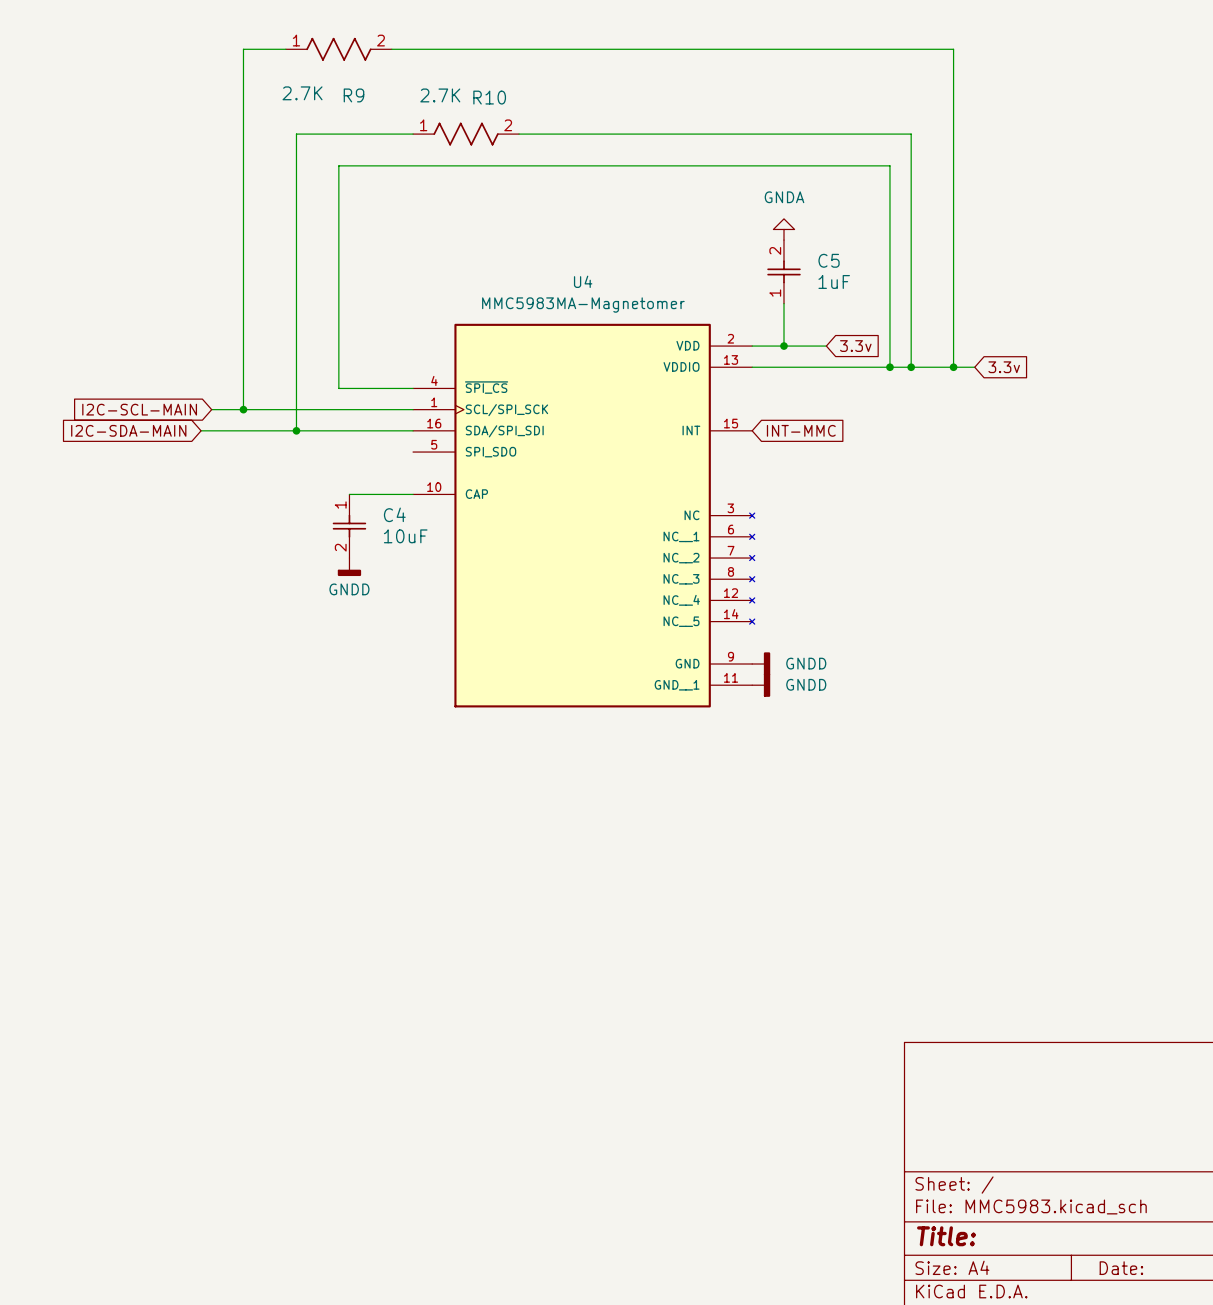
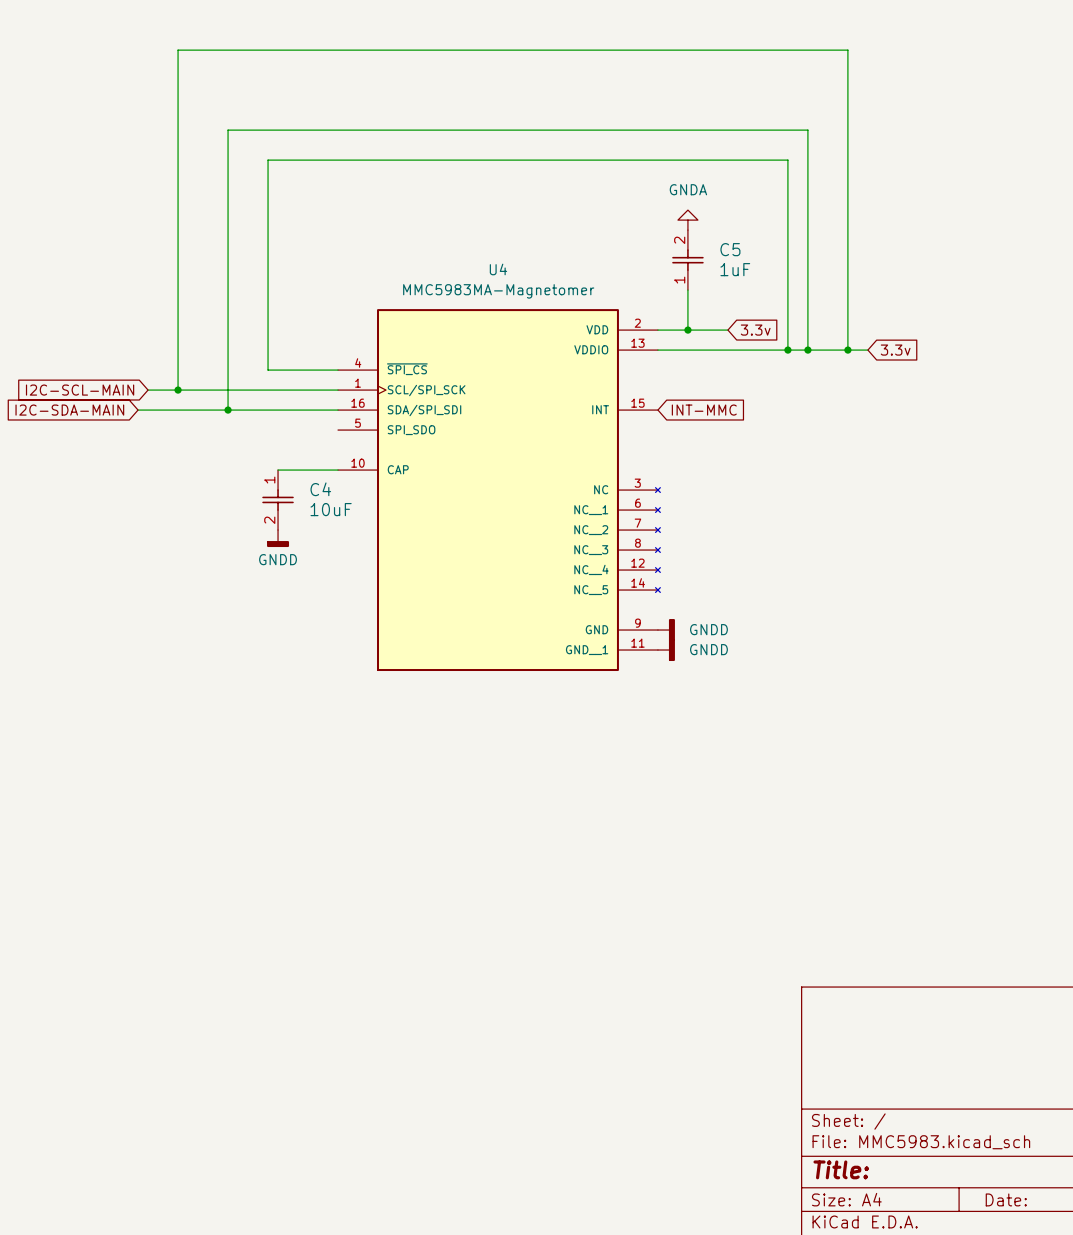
R9: 2.7K (338, 49) -> none
R10: 2.7K (466, 134) -> none

